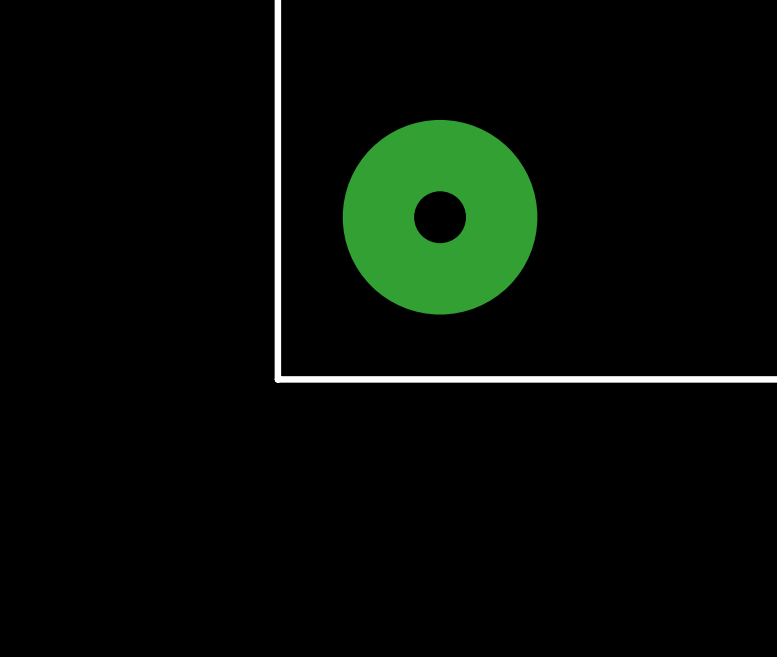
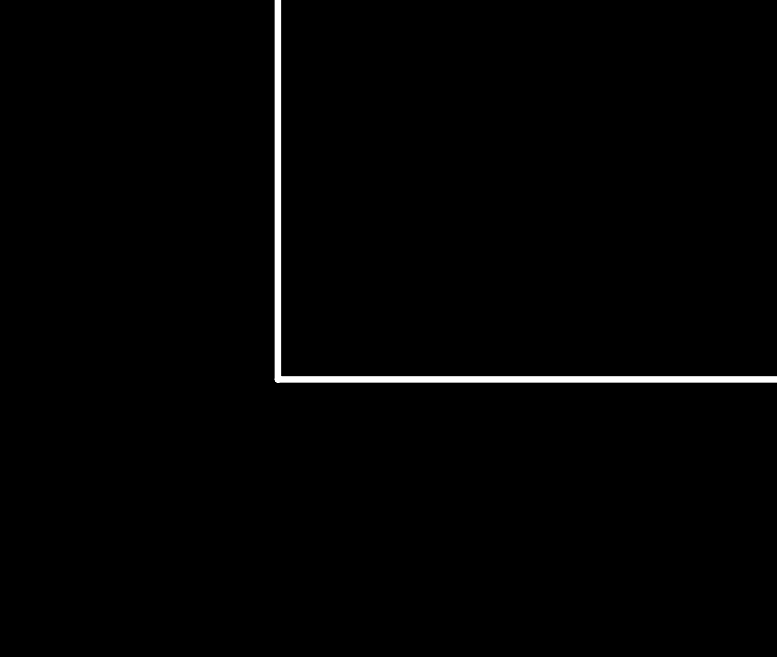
via: (440, 217) -> none

